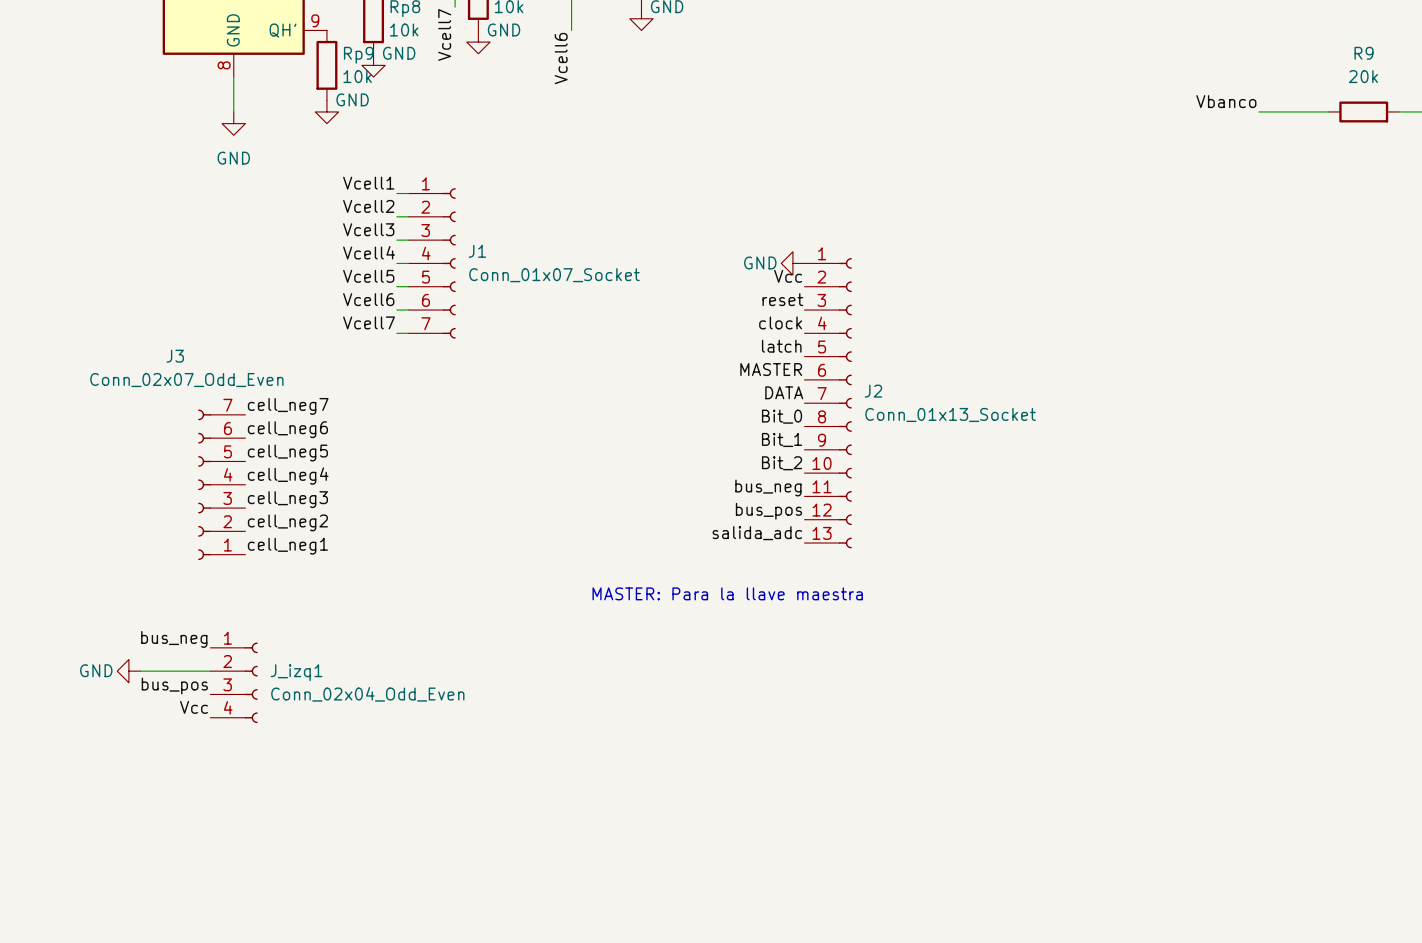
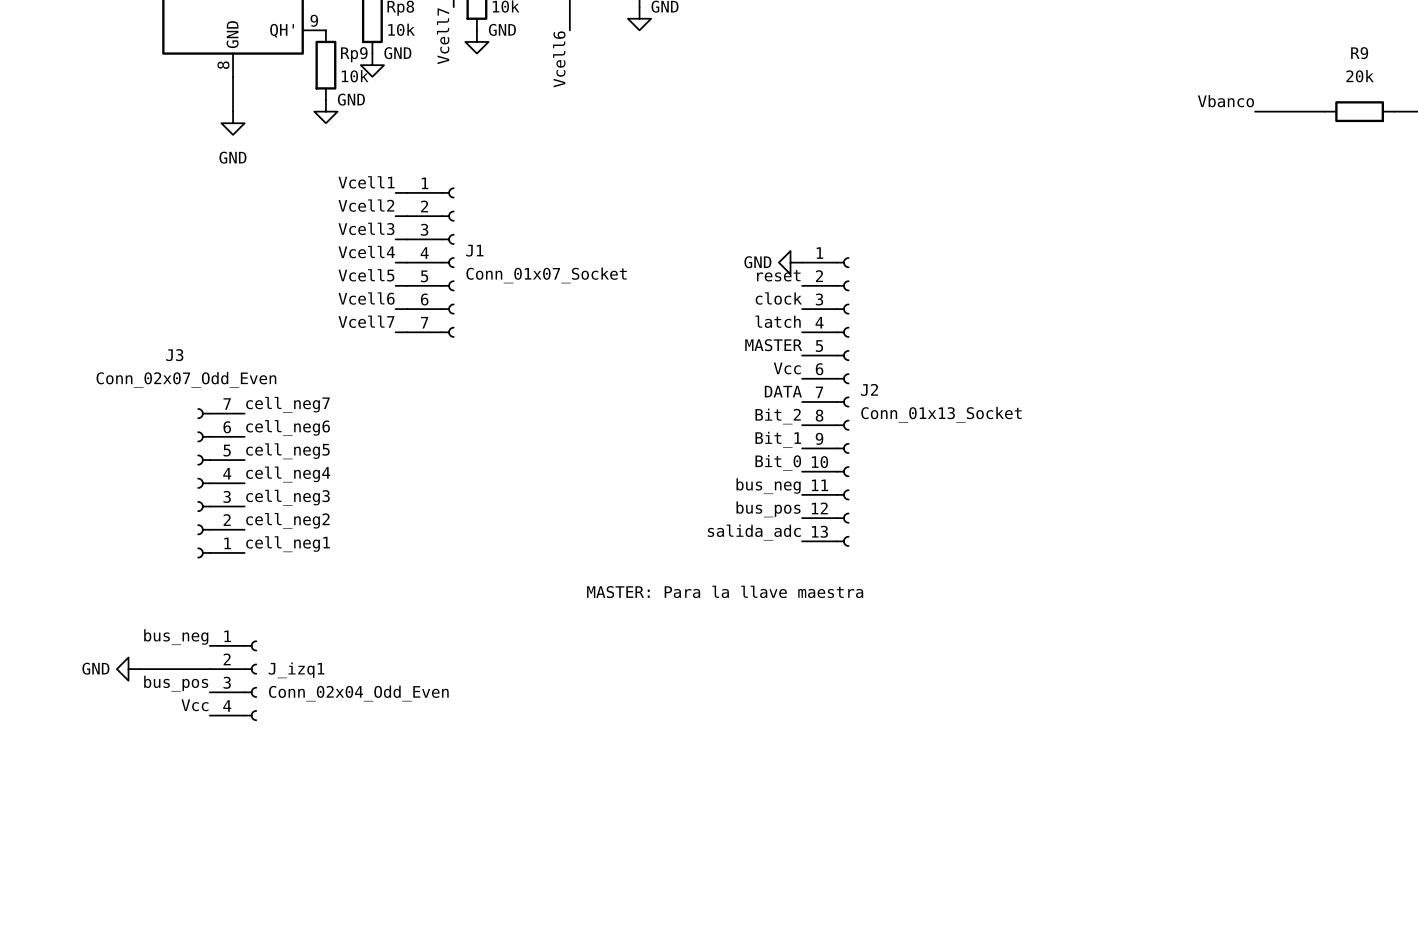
label: Vcc (788, 276) -> reset (778, 275)
label: reset (782, 299) -> clock (778, 298)
label: clock (780, 322) -> latch (778, 321)
label: latch (781, 346) -> MASTER (773, 345)
label: MASTER (771, 369) -> Vcc (787, 368)
label: Bit_0 (782, 416) -> Bit_2 (778, 416)
label: Bit_2 (782, 463) -> Bit_0 (778, 462)

